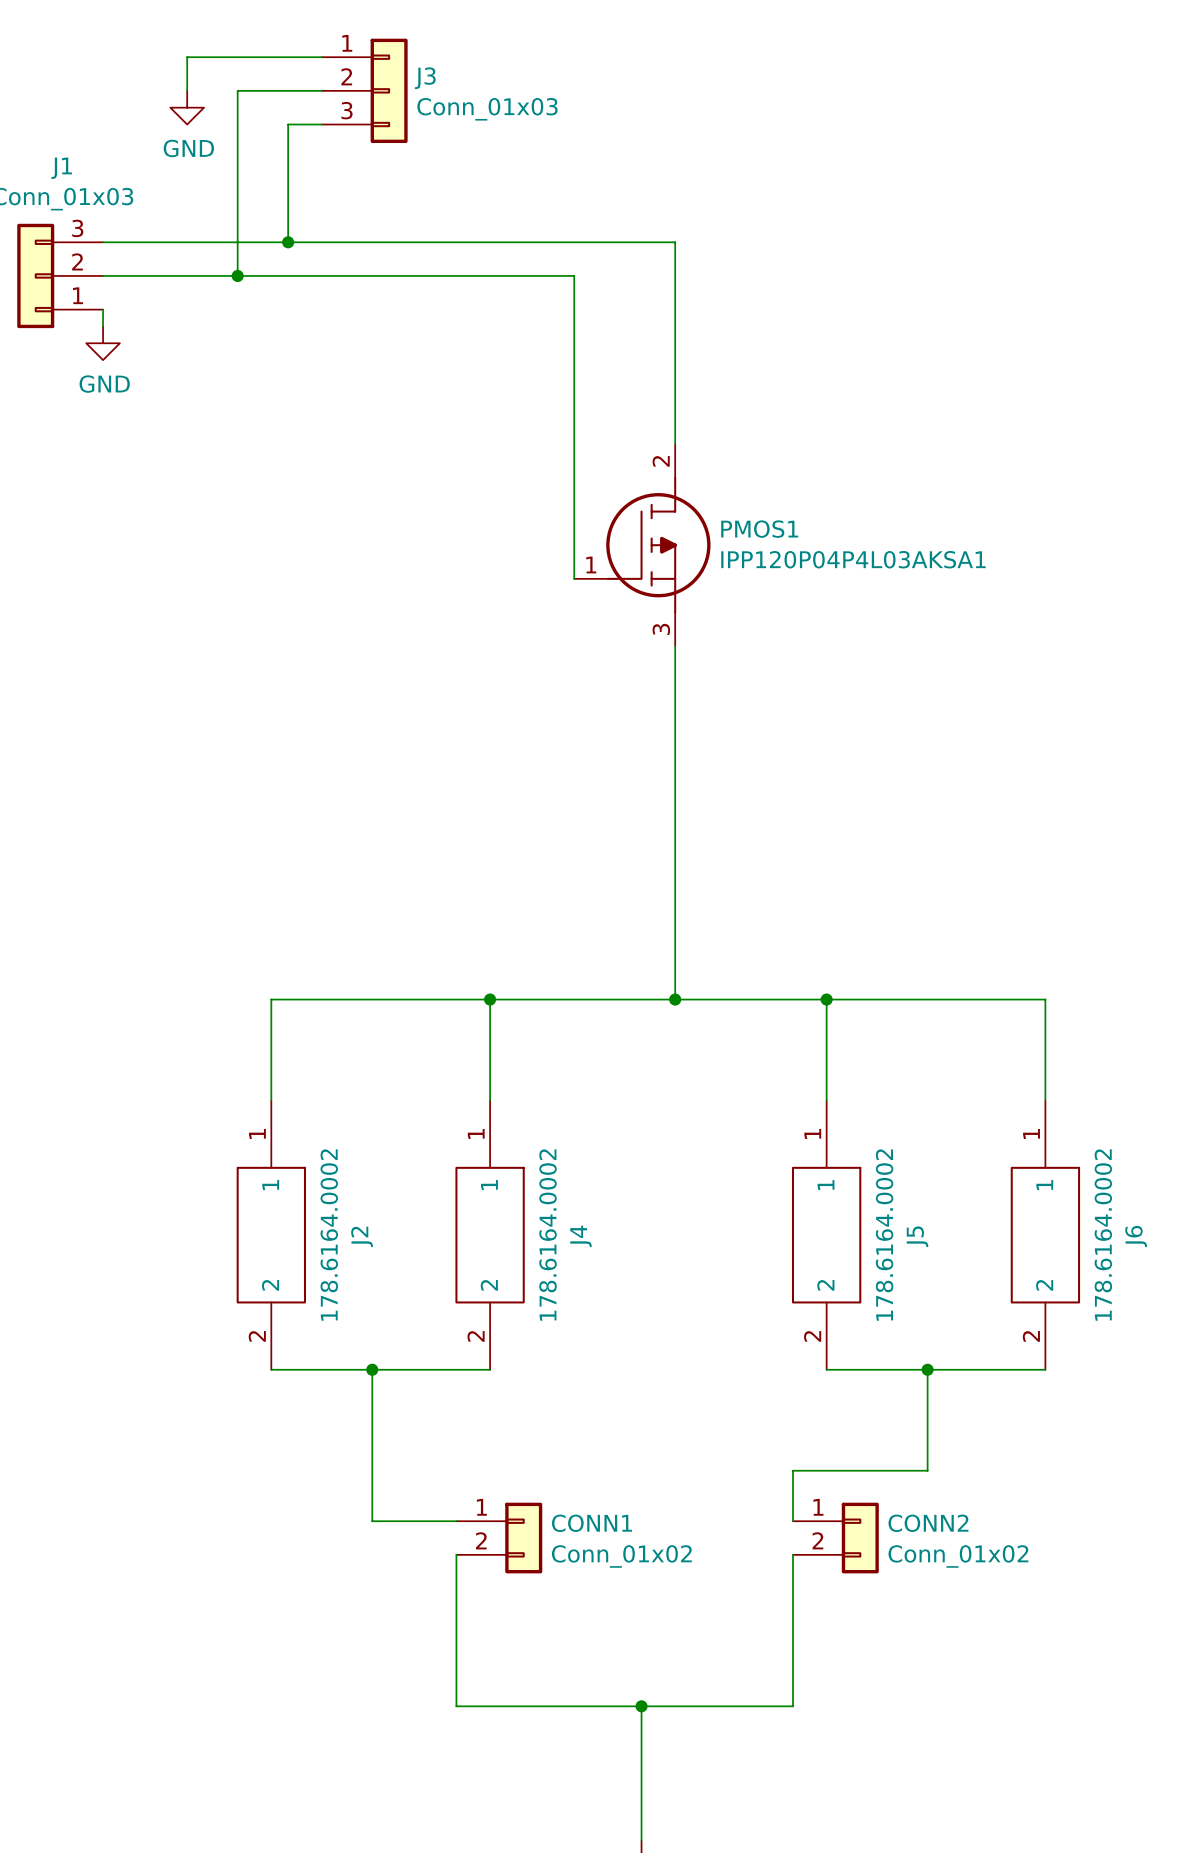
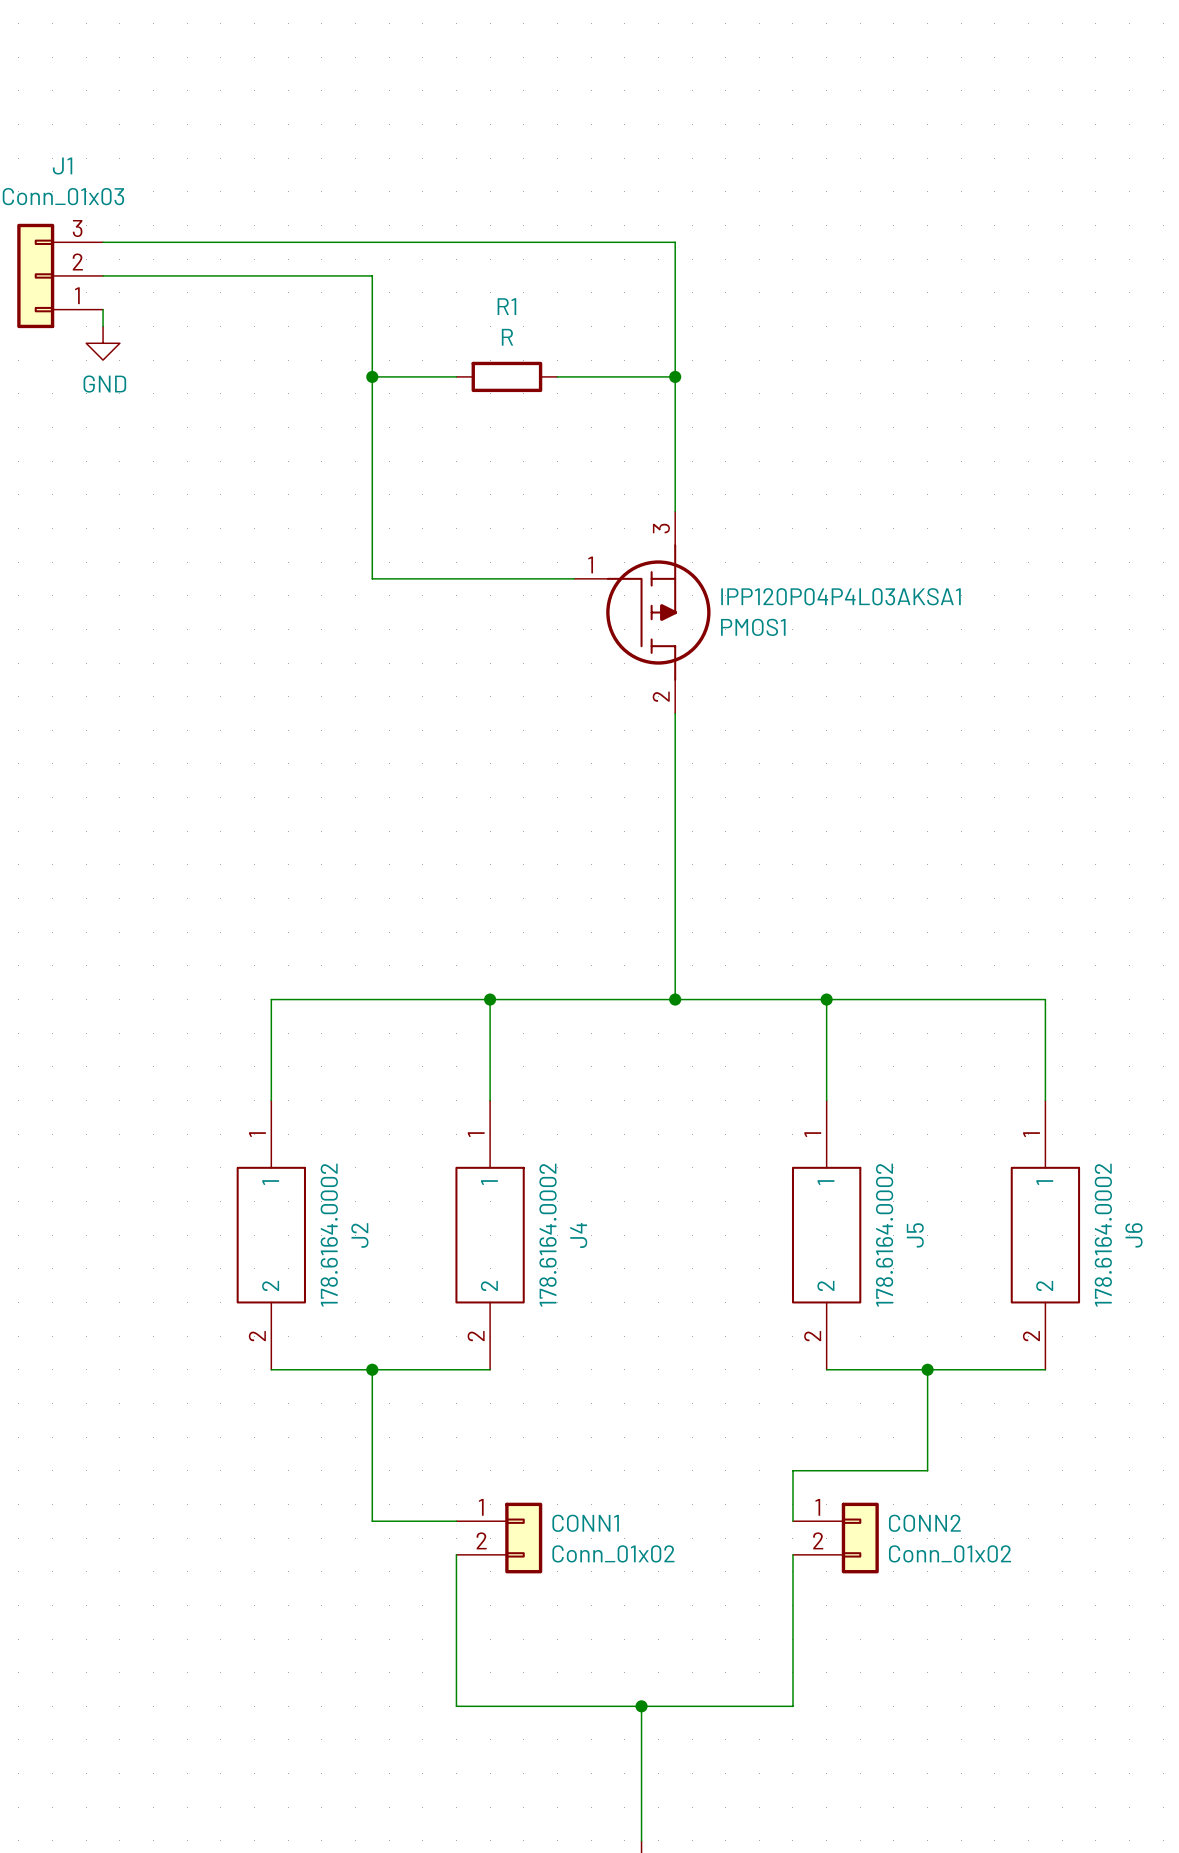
wire: (321, 57) (187, 57) (187, 90) -> none
wire: (321, 90) (237, 90) (237, 275) -> none
J3: Conn_01x03 (364, 90) -> none
power symbol: GND (187, 107) -> none
wire: (321, 124) (288, 124) (288, 242) -> none
junction: (288, 242) -> none
junction: (237, 275) -> none
wire: (372, 275) (574, 275) (574, 578) -> (372, 275) (372, 578) (574, 578)
wire: none -> (372, 376) (456, 376)
junction: none -> (372, 376)
R1: none -> R (506, 376)
wire: none -> (557, 376) (675, 376)
junction: none -> (675, 376)
PMOS1 flip: as is (658, 545) -> up-down (658, 612)

